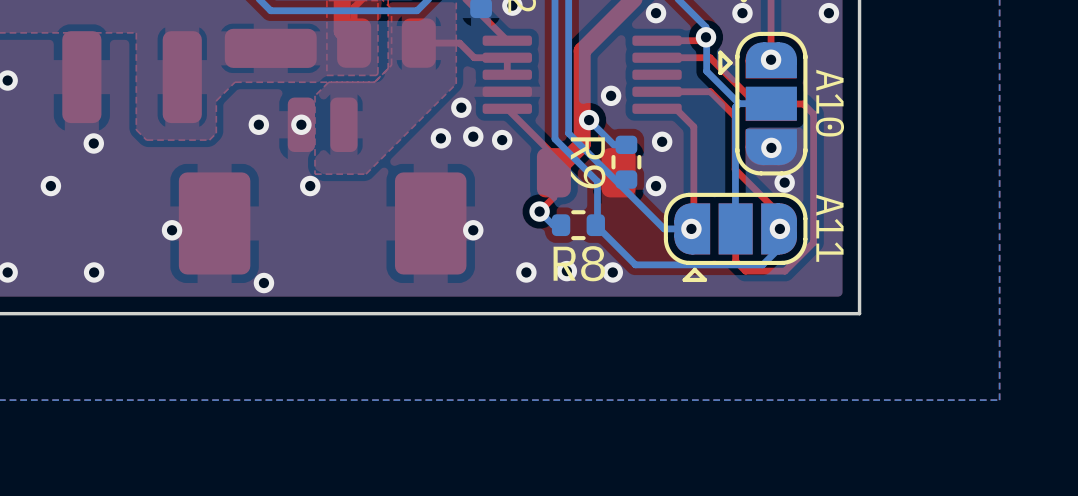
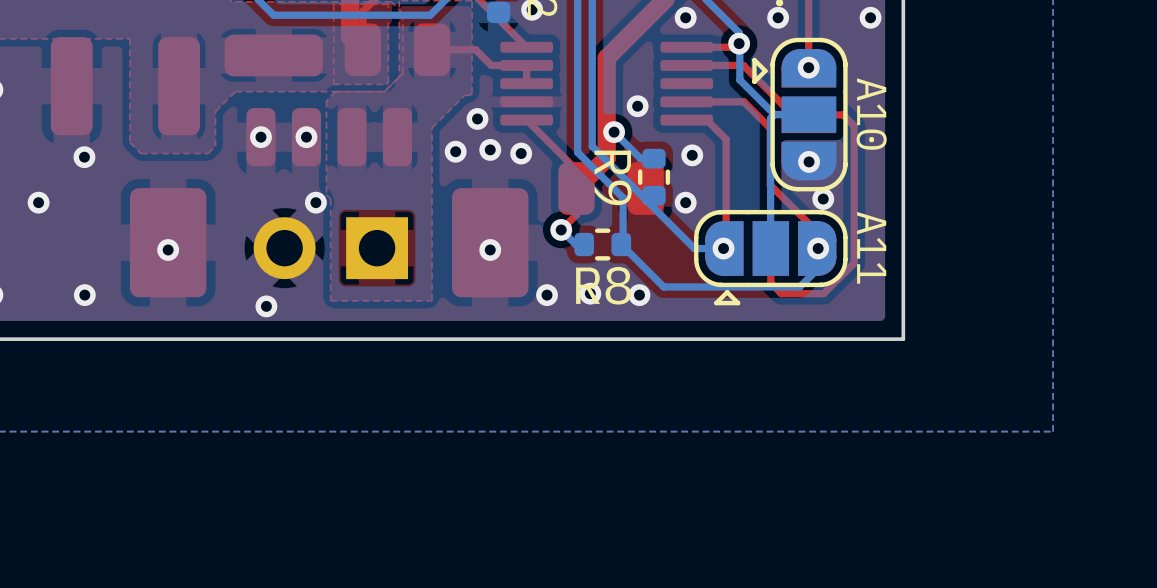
top zone outline: (454, 85) (366, 174) (315, 174) (315, 95) (320, 90) -> (470, 95) (464, 95) (432, 128) (432, 300) (330, 300) (330, 199) (326, 194) (326, 100)
part footprint: [178, 97, 467, 275] -> [129, 108, 529, 298]
part: none -> (330, 248)

